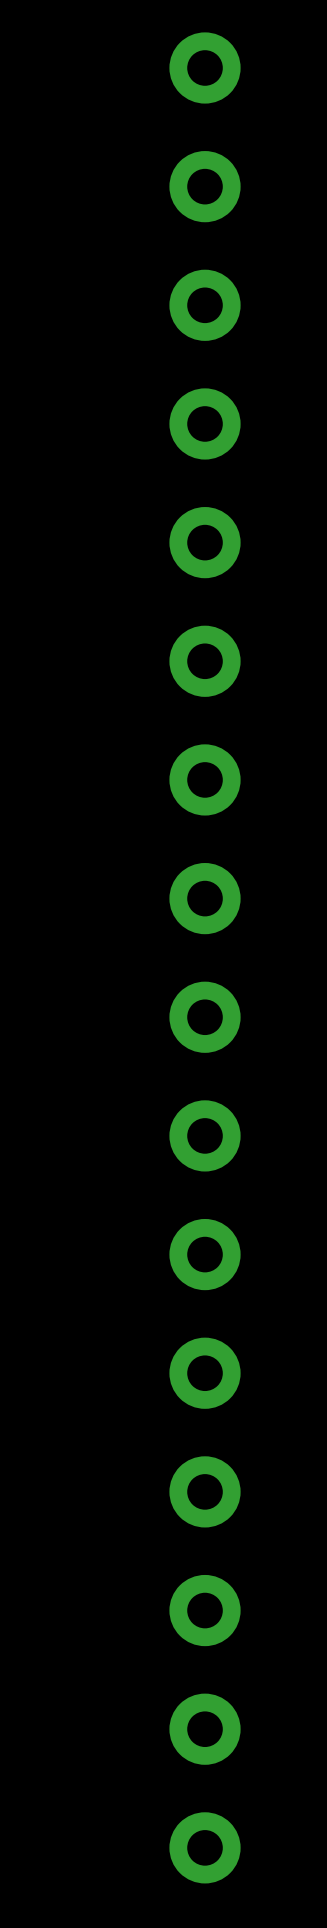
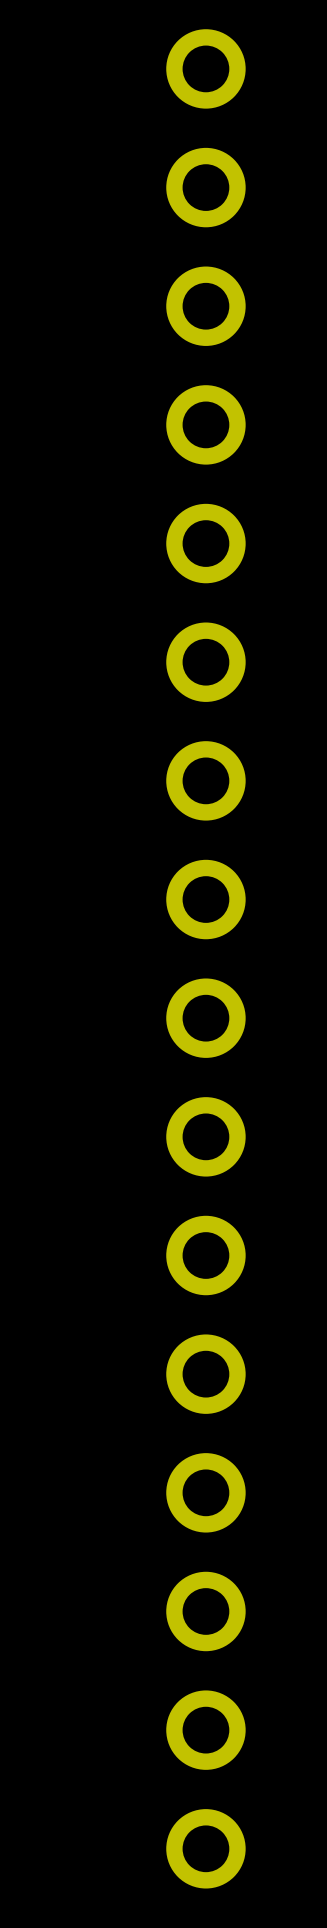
part footprint: [169, 32, 241, 1884] -> [166, 29, 246, 1889]

